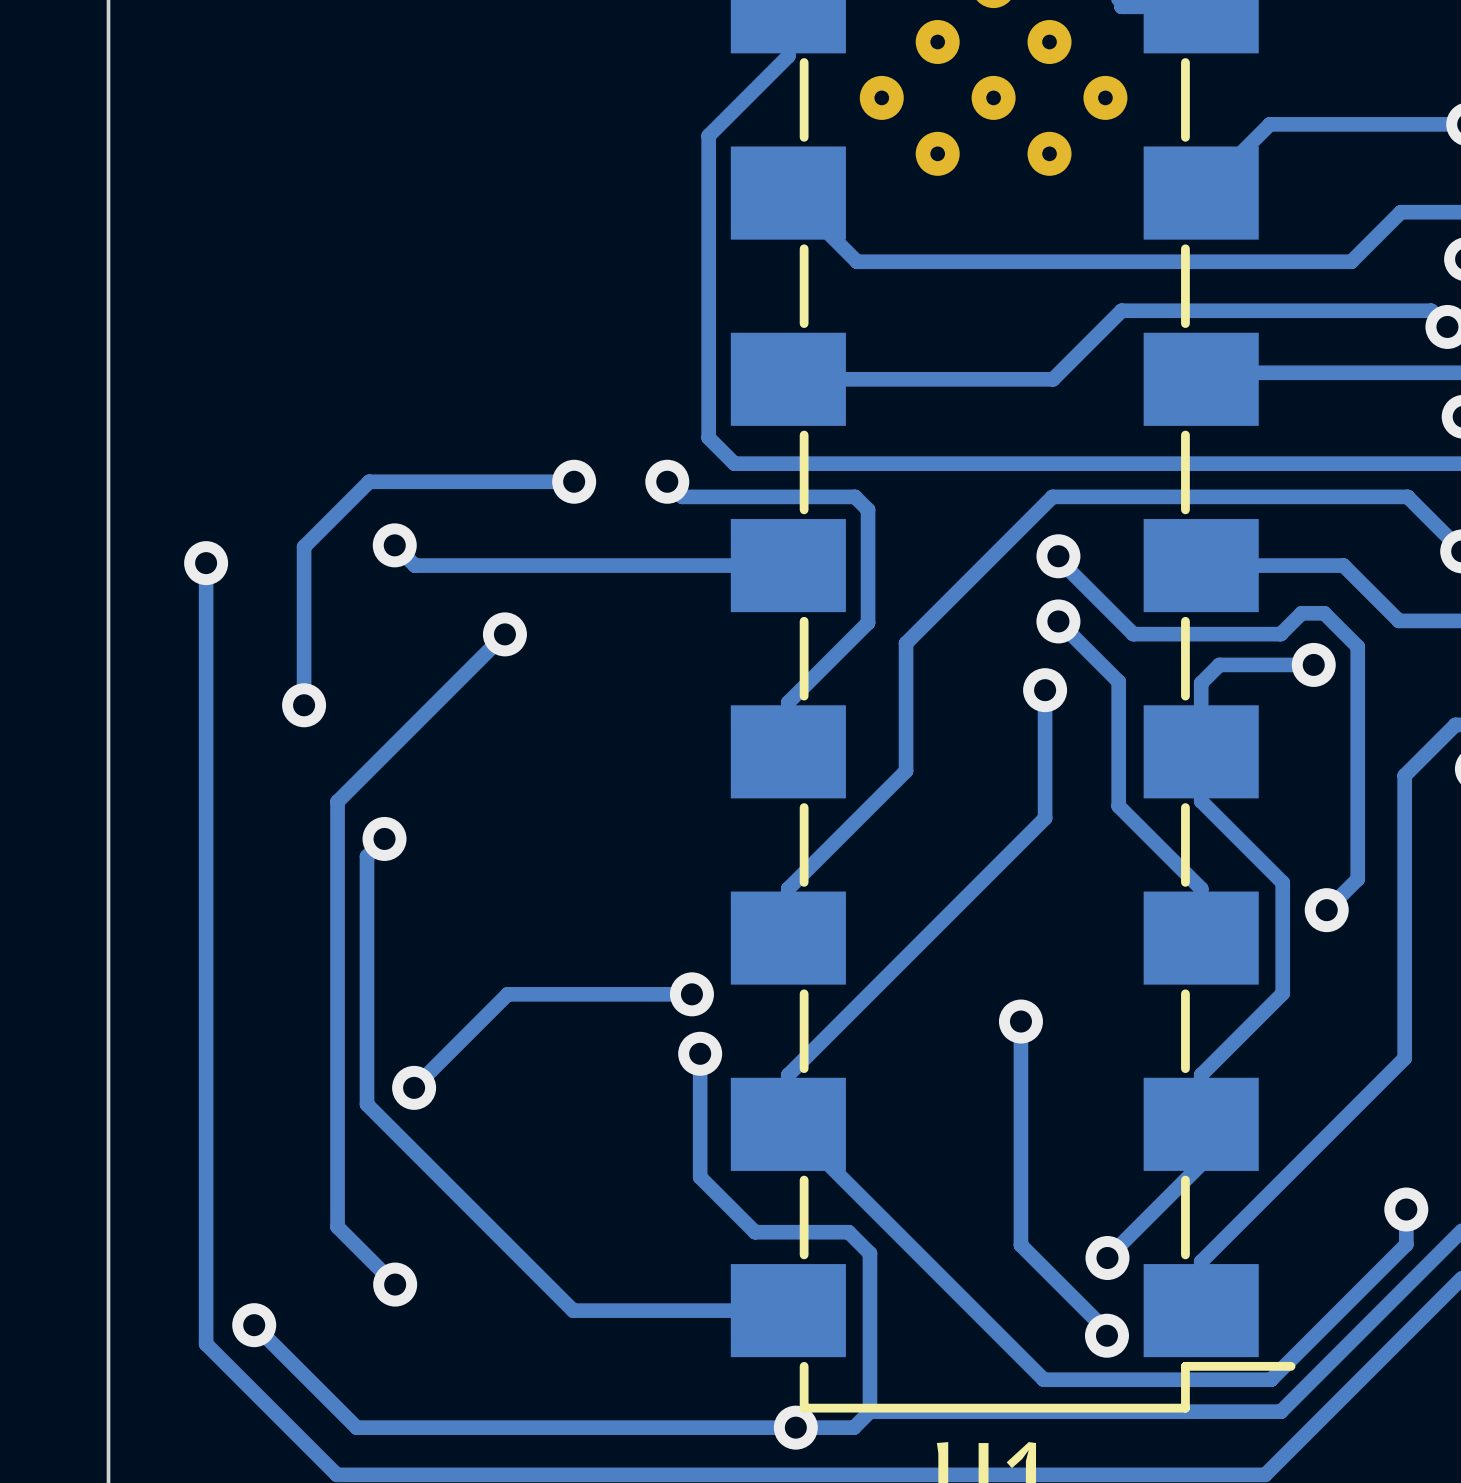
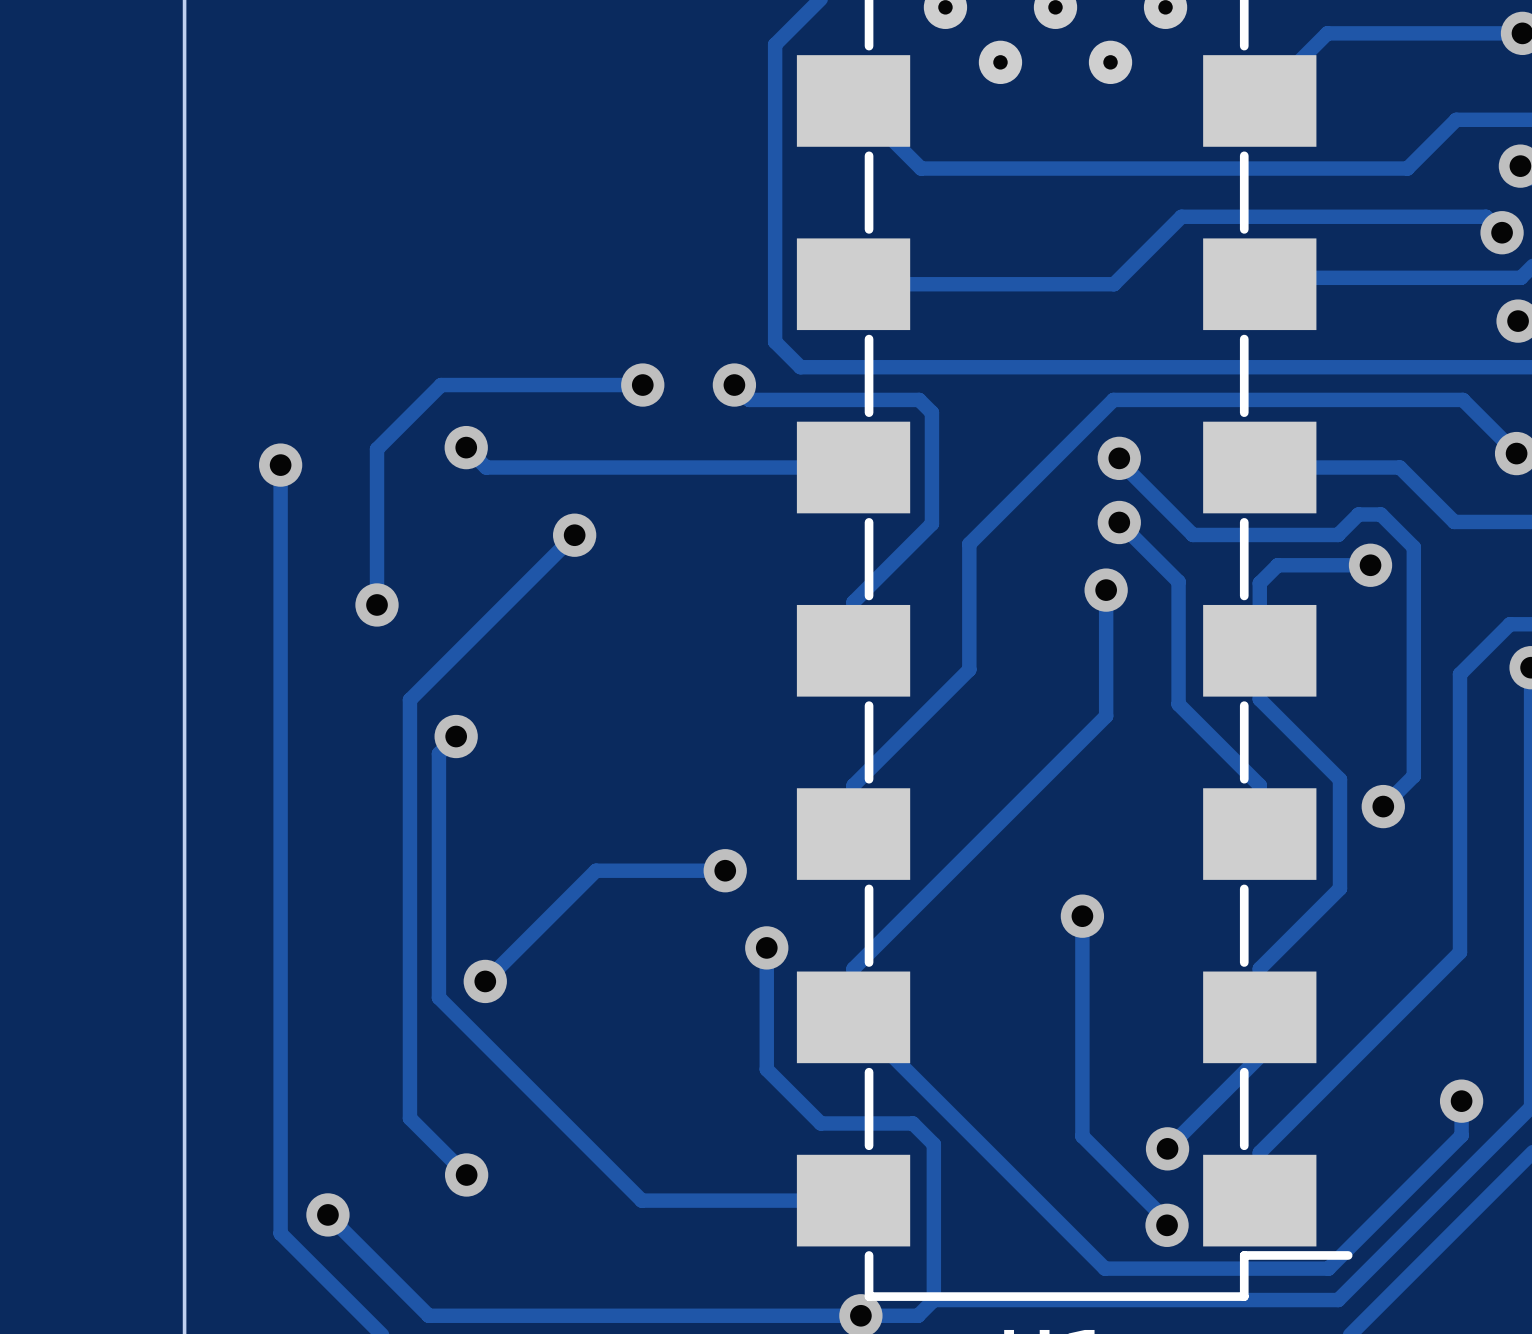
track: (691, 994) (507, 994) -> (725, 870) (596, 870) (577, 889)
via position: (691, 994) -> (725, 870)

